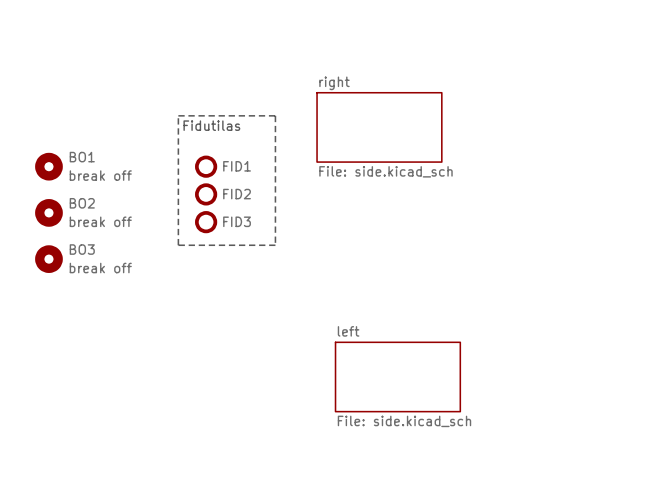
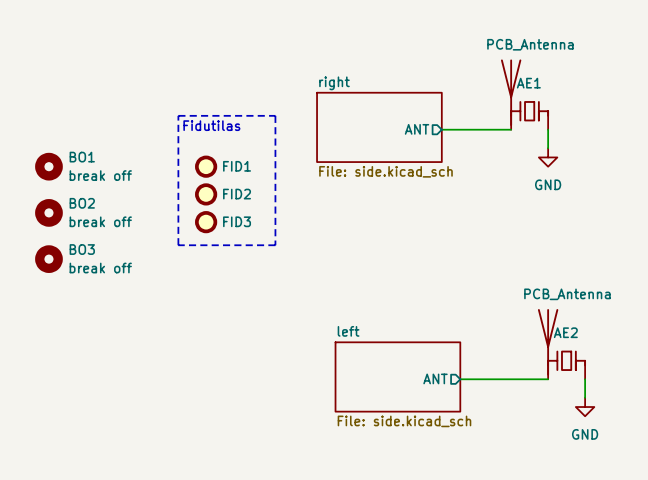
AE1: none -> PCB_Antenna (525, 94)
sheet pin: none -> ANT (417, 129)
wire: none -> (441, 129) (511, 129)
wire: none -> (548, 129) (548, 148)
power symbol: none -> GND (548, 157)
AE2: none -> PCB_Antenna (561, 344)
sheet pin: none -> ANT (435, 378)
wire: none -> (460, 379) (548, 379)
wire: none -> (585, 379) (585, 397)
power symbol: none -> GND (585, 407)

